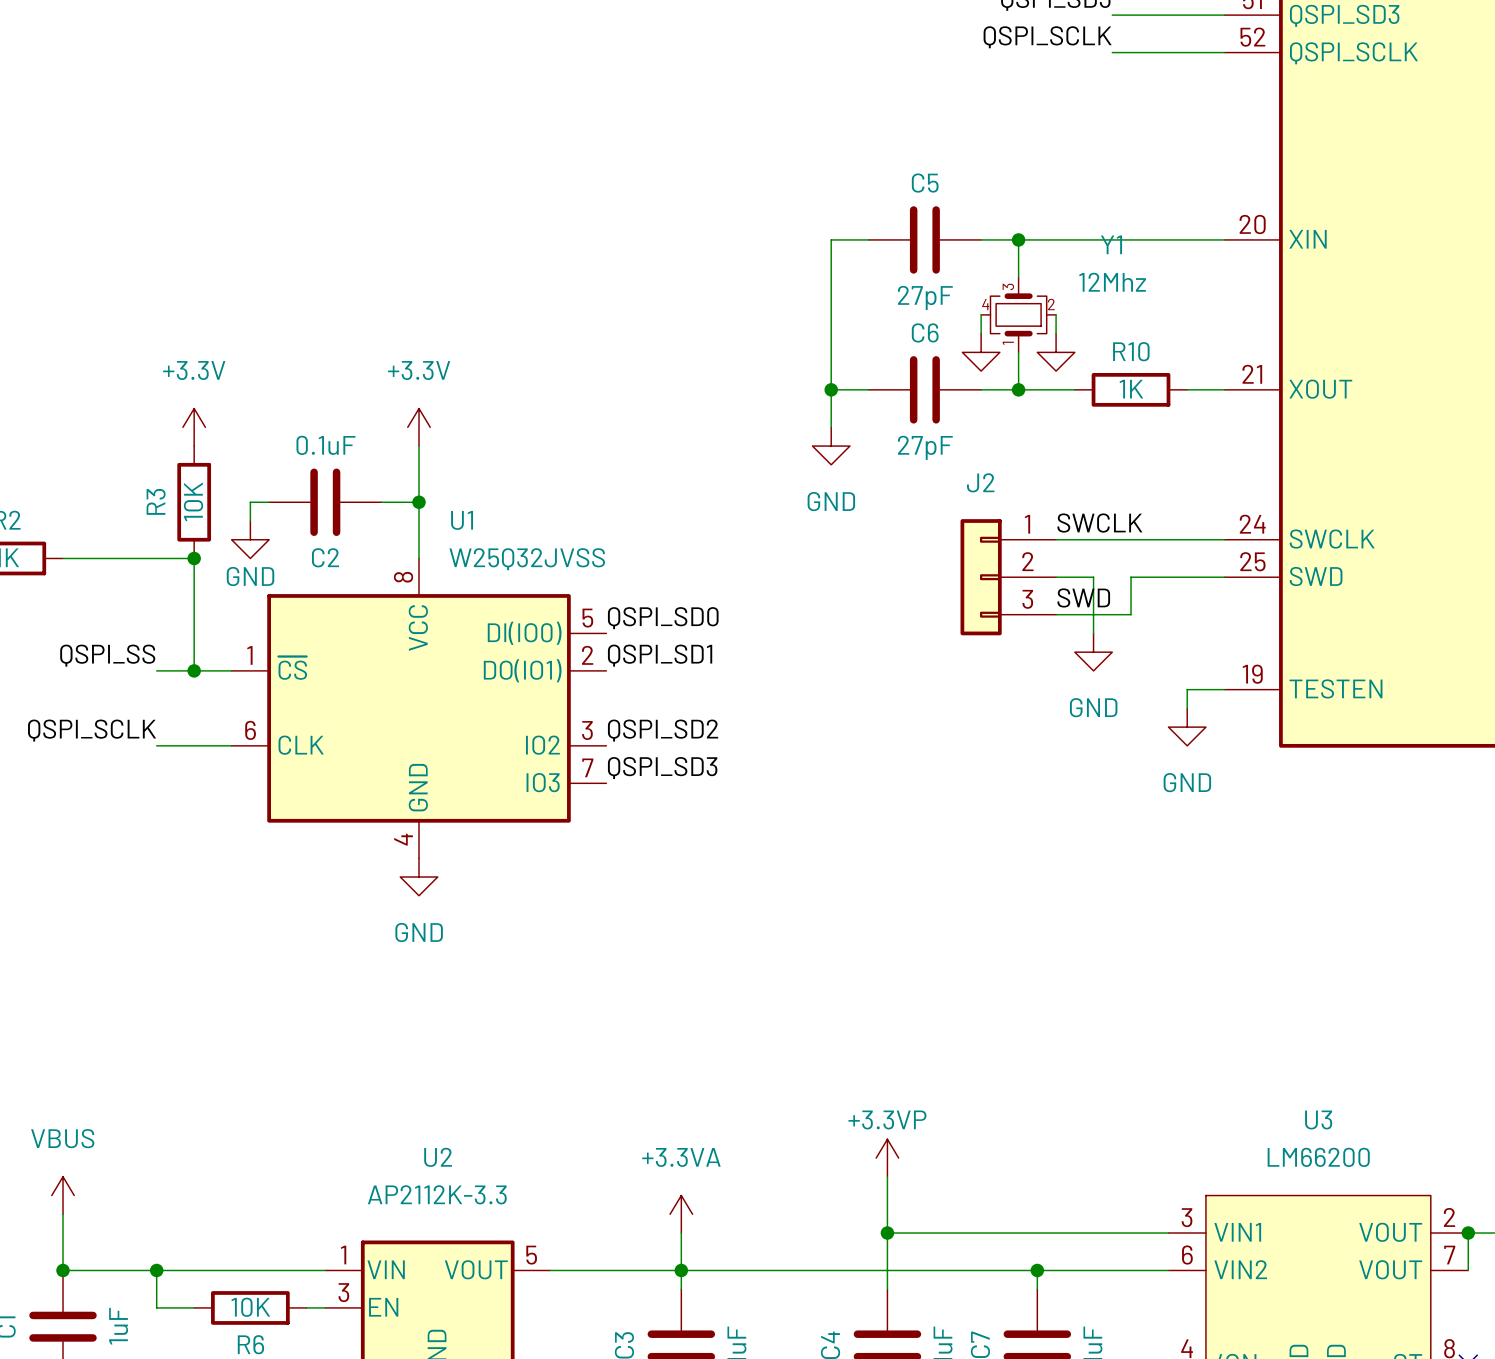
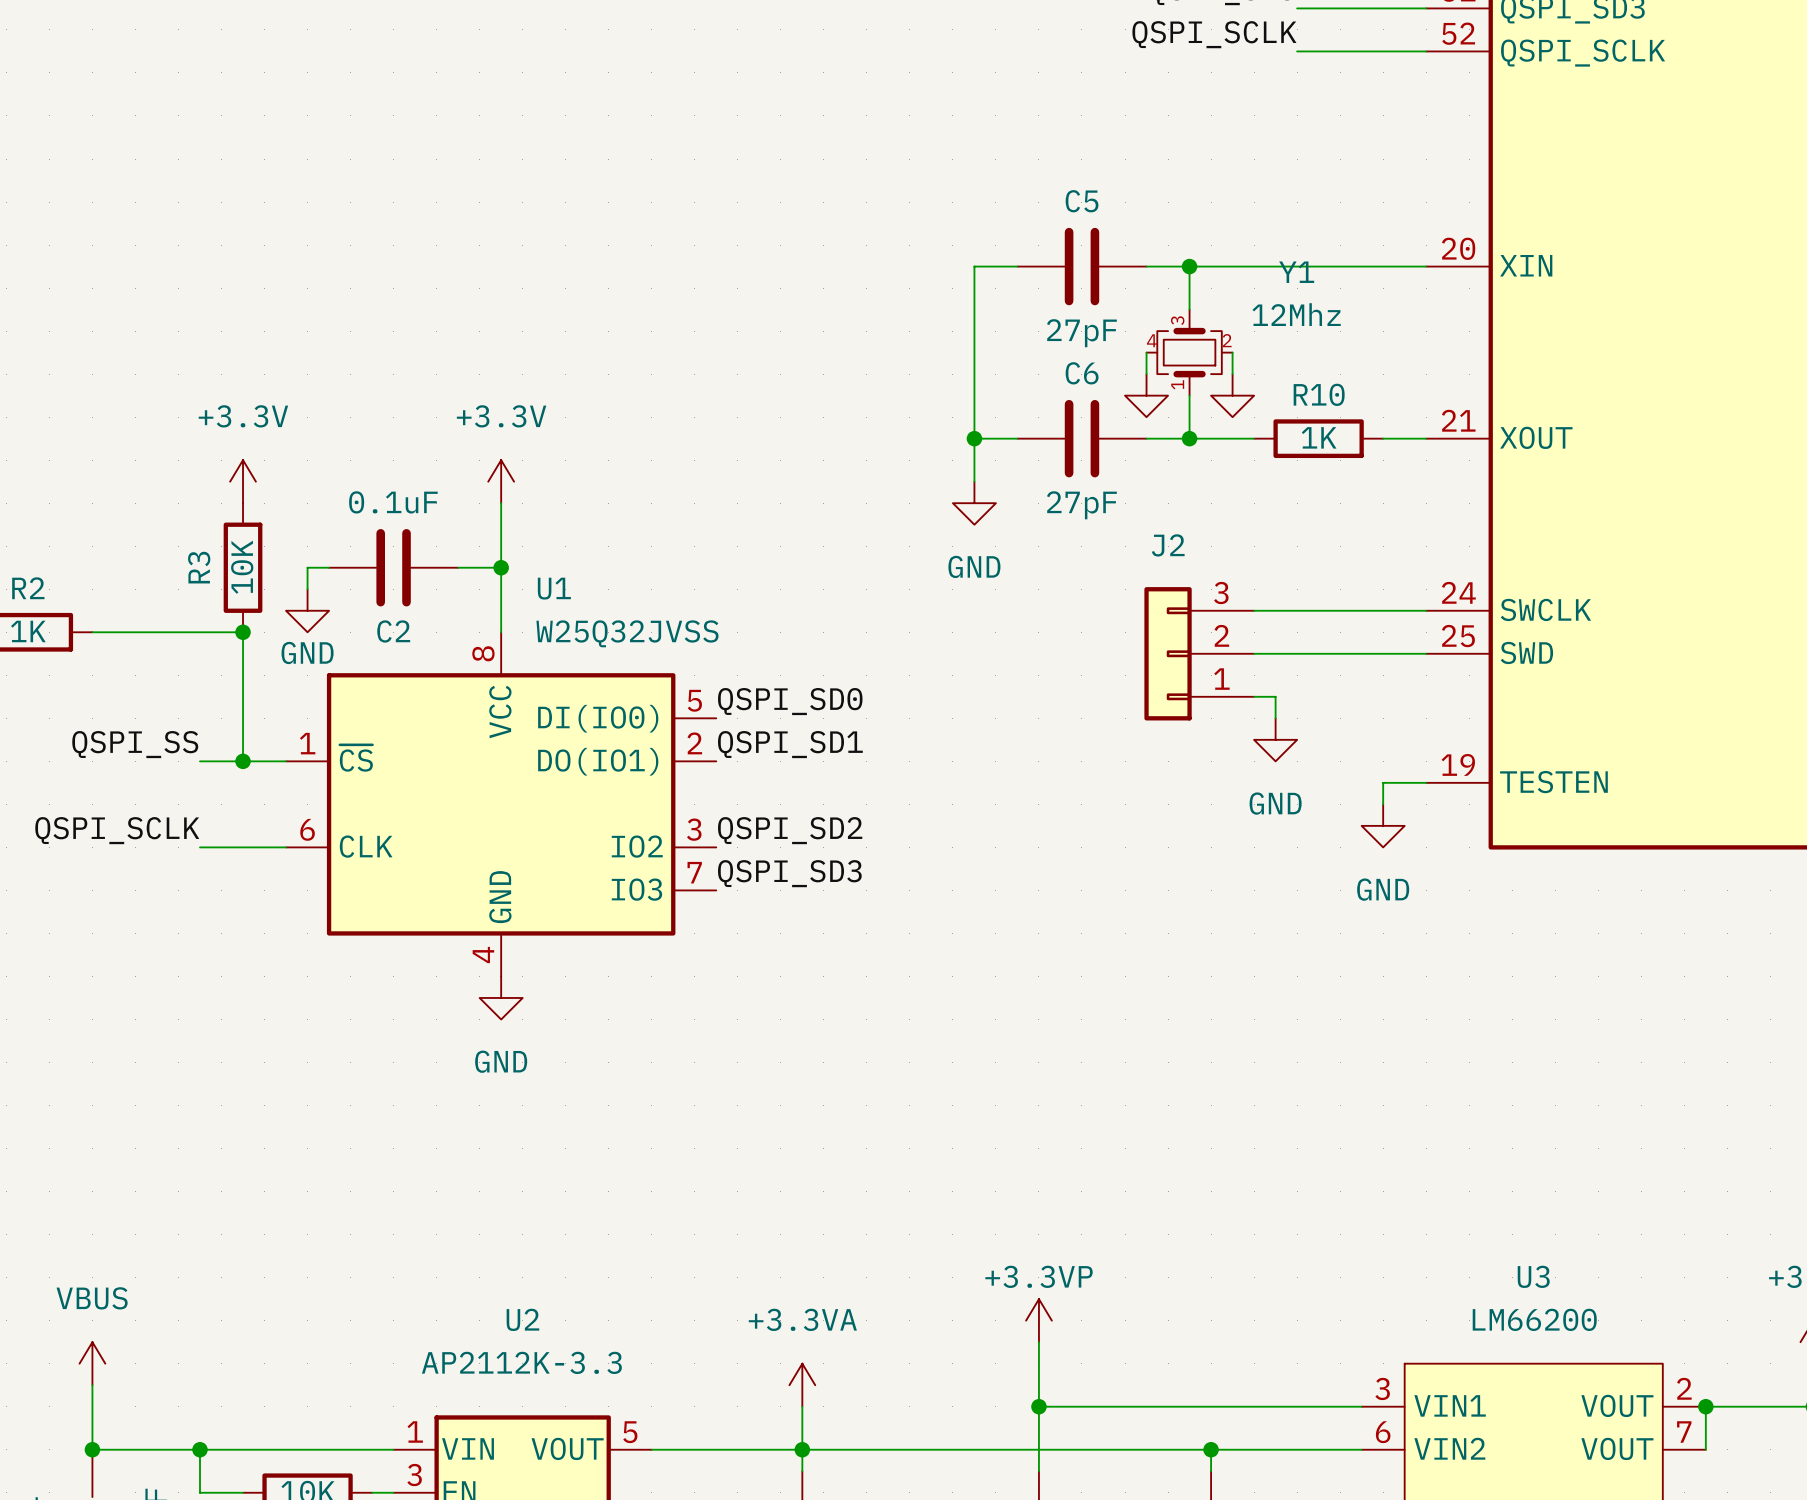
label: SWCLK (1099, 523) -> none
J2 flip: as is (981, 577) -> up-down (1168, 653)
wire: (1093, 577) (1093, 614) (1131, 614) (1131, 577) -> (1275, 653) (1318, 653)
label: SWD (1083, 597) -> none

